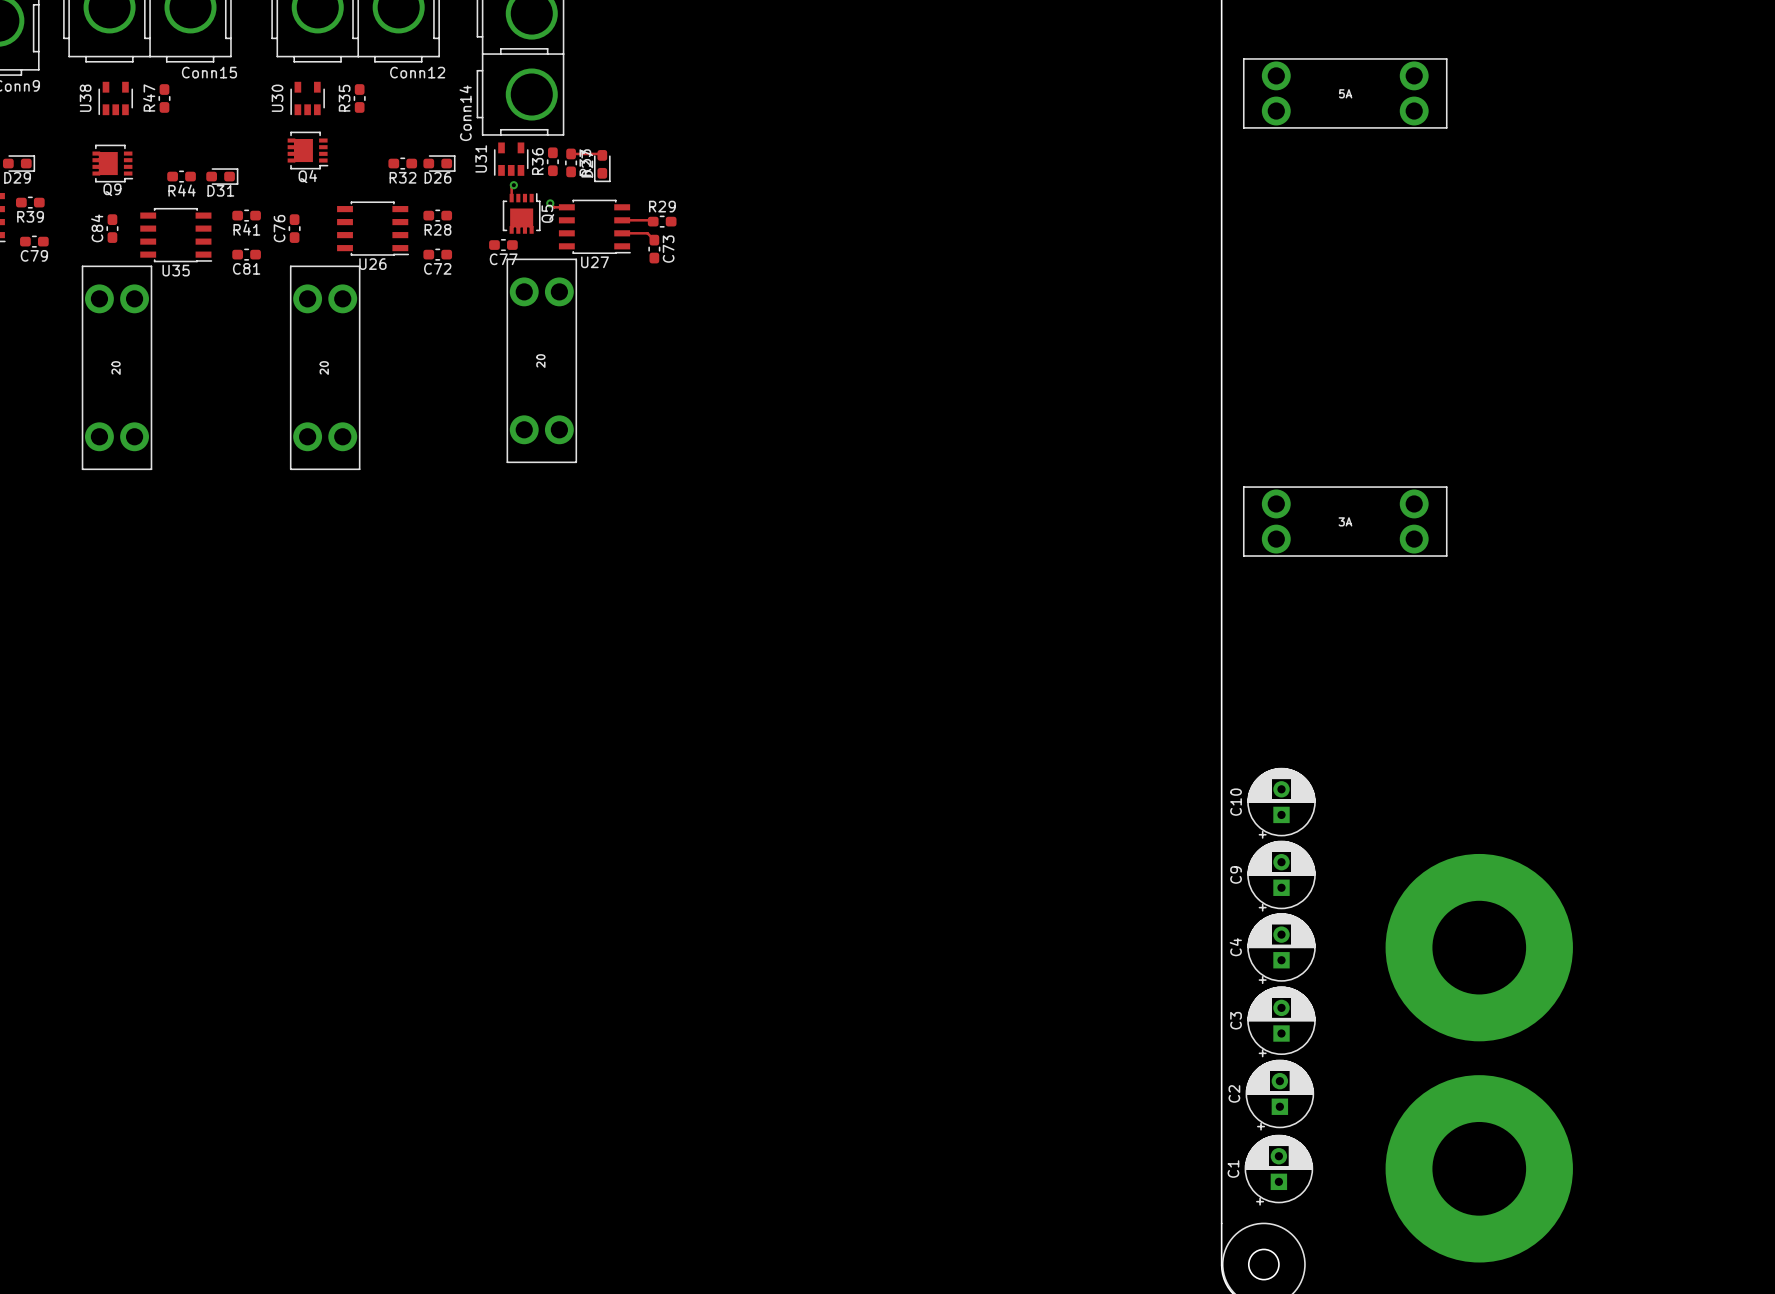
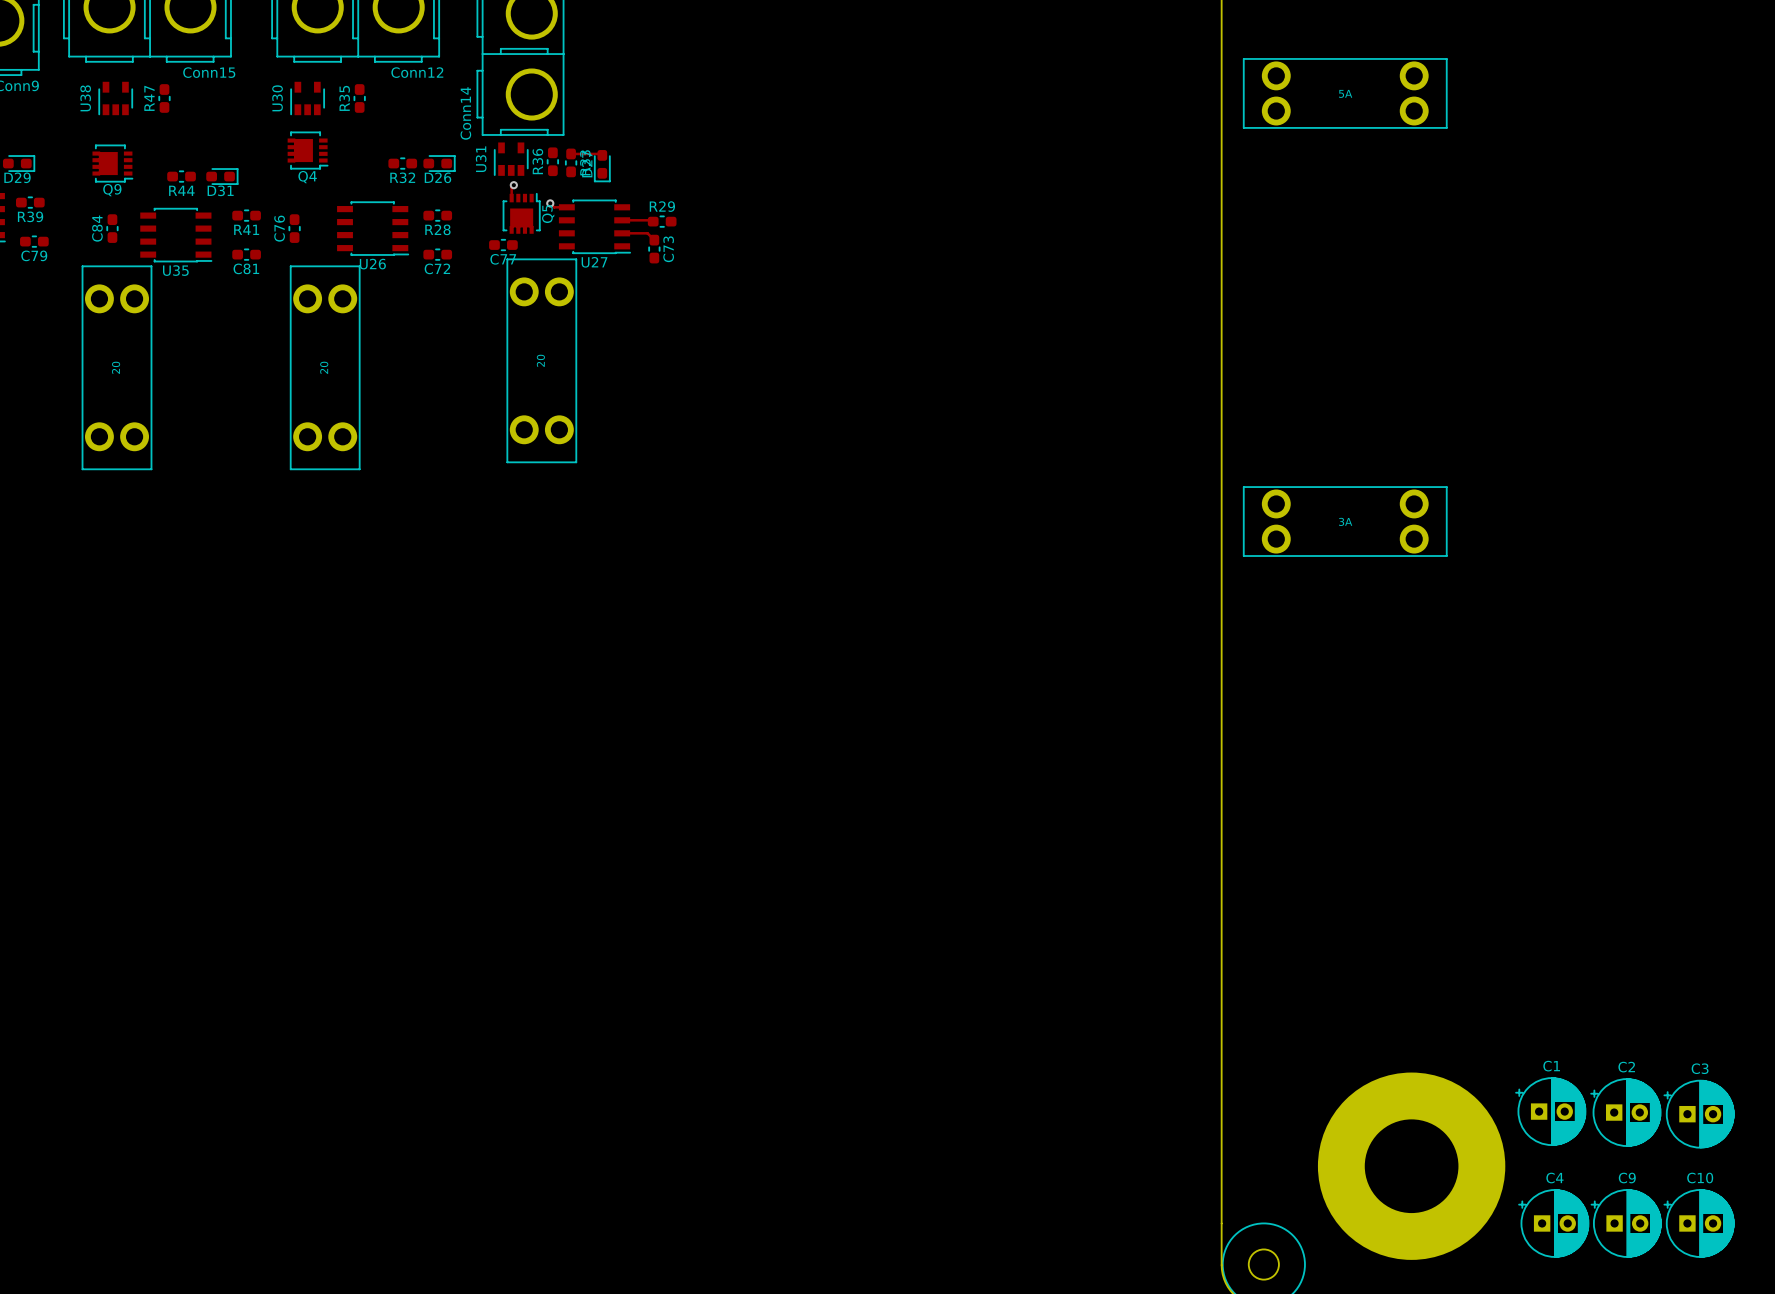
C10 rotation: 0° (1281, 803) -> 90° clockwise (1699, 1223)
C10 position: (1281, 803) -> (1699, 1223)
C9 rotation: 0° (1281, 876) -> 90° clockwise (1626, 1223)
C9 position: (1281, 876) -> (1626, 1223)
part: (1479, 947) -> none
C4 rotation: 0° (1281, 948) -> 90° clockwise (1553, 1223)
C4 position: (1281, 948) -> (1553, 1223)
C3 rotation: 0° (1281, 1021) -> 90° clockwise (1699, 1114)
C3 position: (1281, 1021) -> (1699, 1114)
C2 rotation: 0° (1279, 1095) -> 90° clockwise (1625, 1112)
C2 position: (1279, 1095) -> (1625, 1112)
part position: (1479, 1168) -> (1411, 1166)
C1 rotation: 0° (1278, 1170) -> 90° clockwise (1550, 1111)
C1 position: (1278, 1170) -> (1550, 1111)

